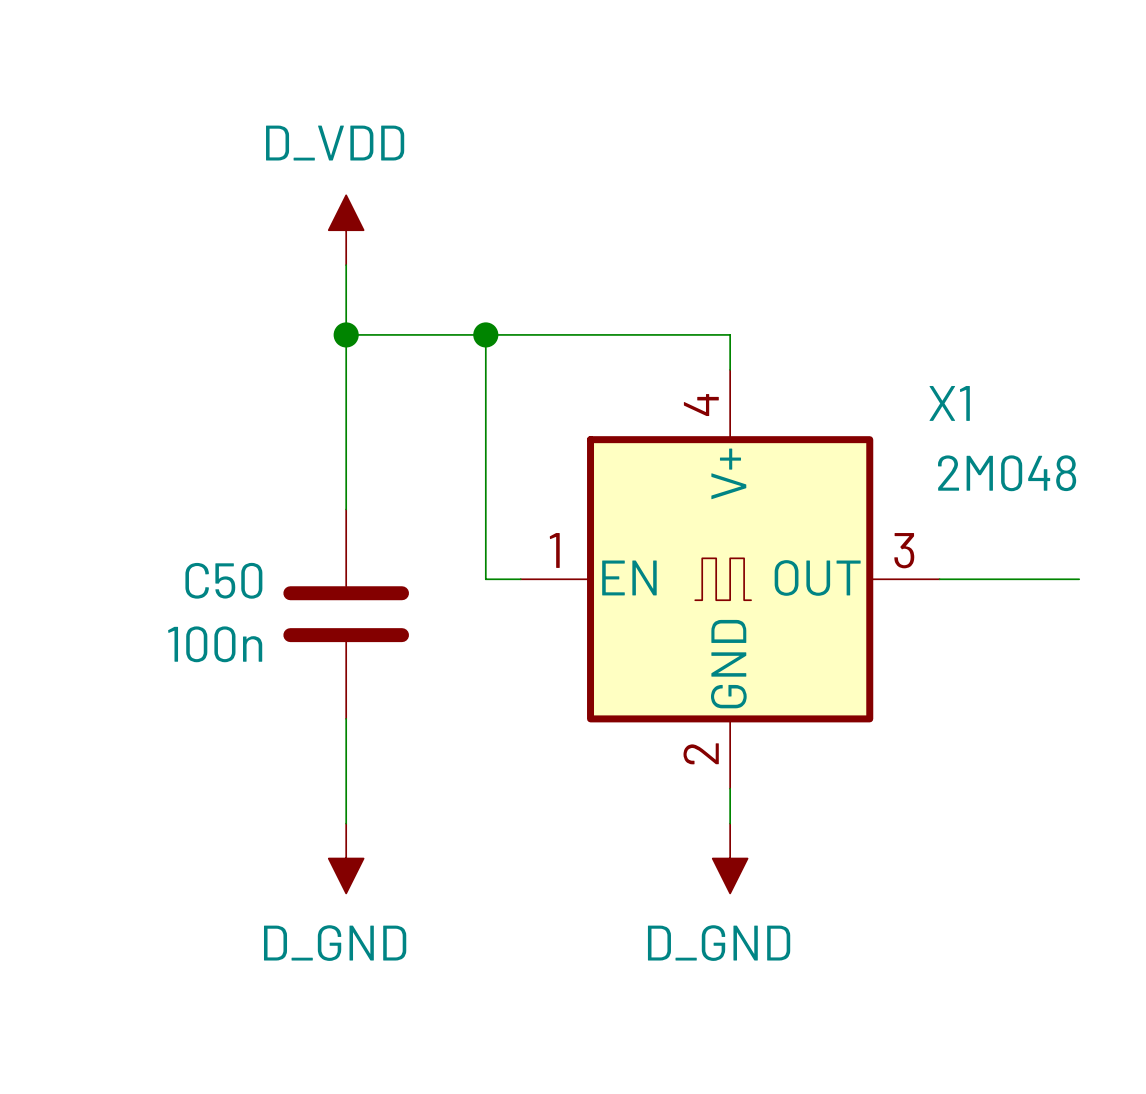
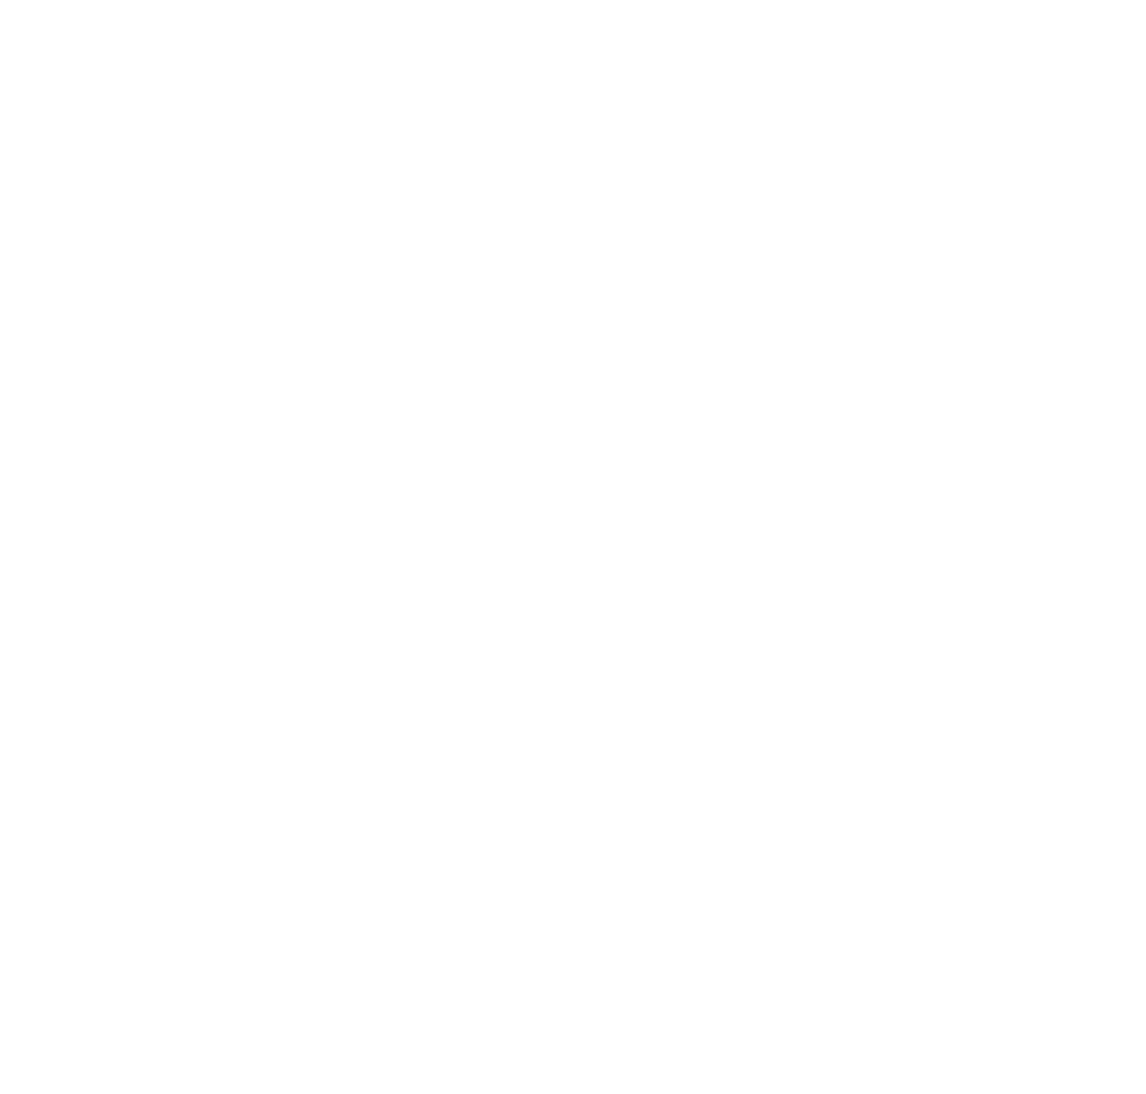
power symbol: D_VDD (346, 230) -> none
wire: (346, 265) (346, 509) -> none
wire: (346, 334) (730, 334) (730, 369) -> none
junction: (346, 334) -> none
wire: (485, 334) (485, 579) (520, 579) -> none
junction: (485, 334) -> none
X1: 2M048 (730, 579) -> none
wire: (939, 579) (1079, 579) -> none
C50: 100n (346, 614) -> none
wire: (346, 718) (346, 823) -> none
wire: (730, 788) (730, 823) -> none
power symbol: D_GND (346, 858) -> none
power symbol: D_GND (730, 858) -> none

